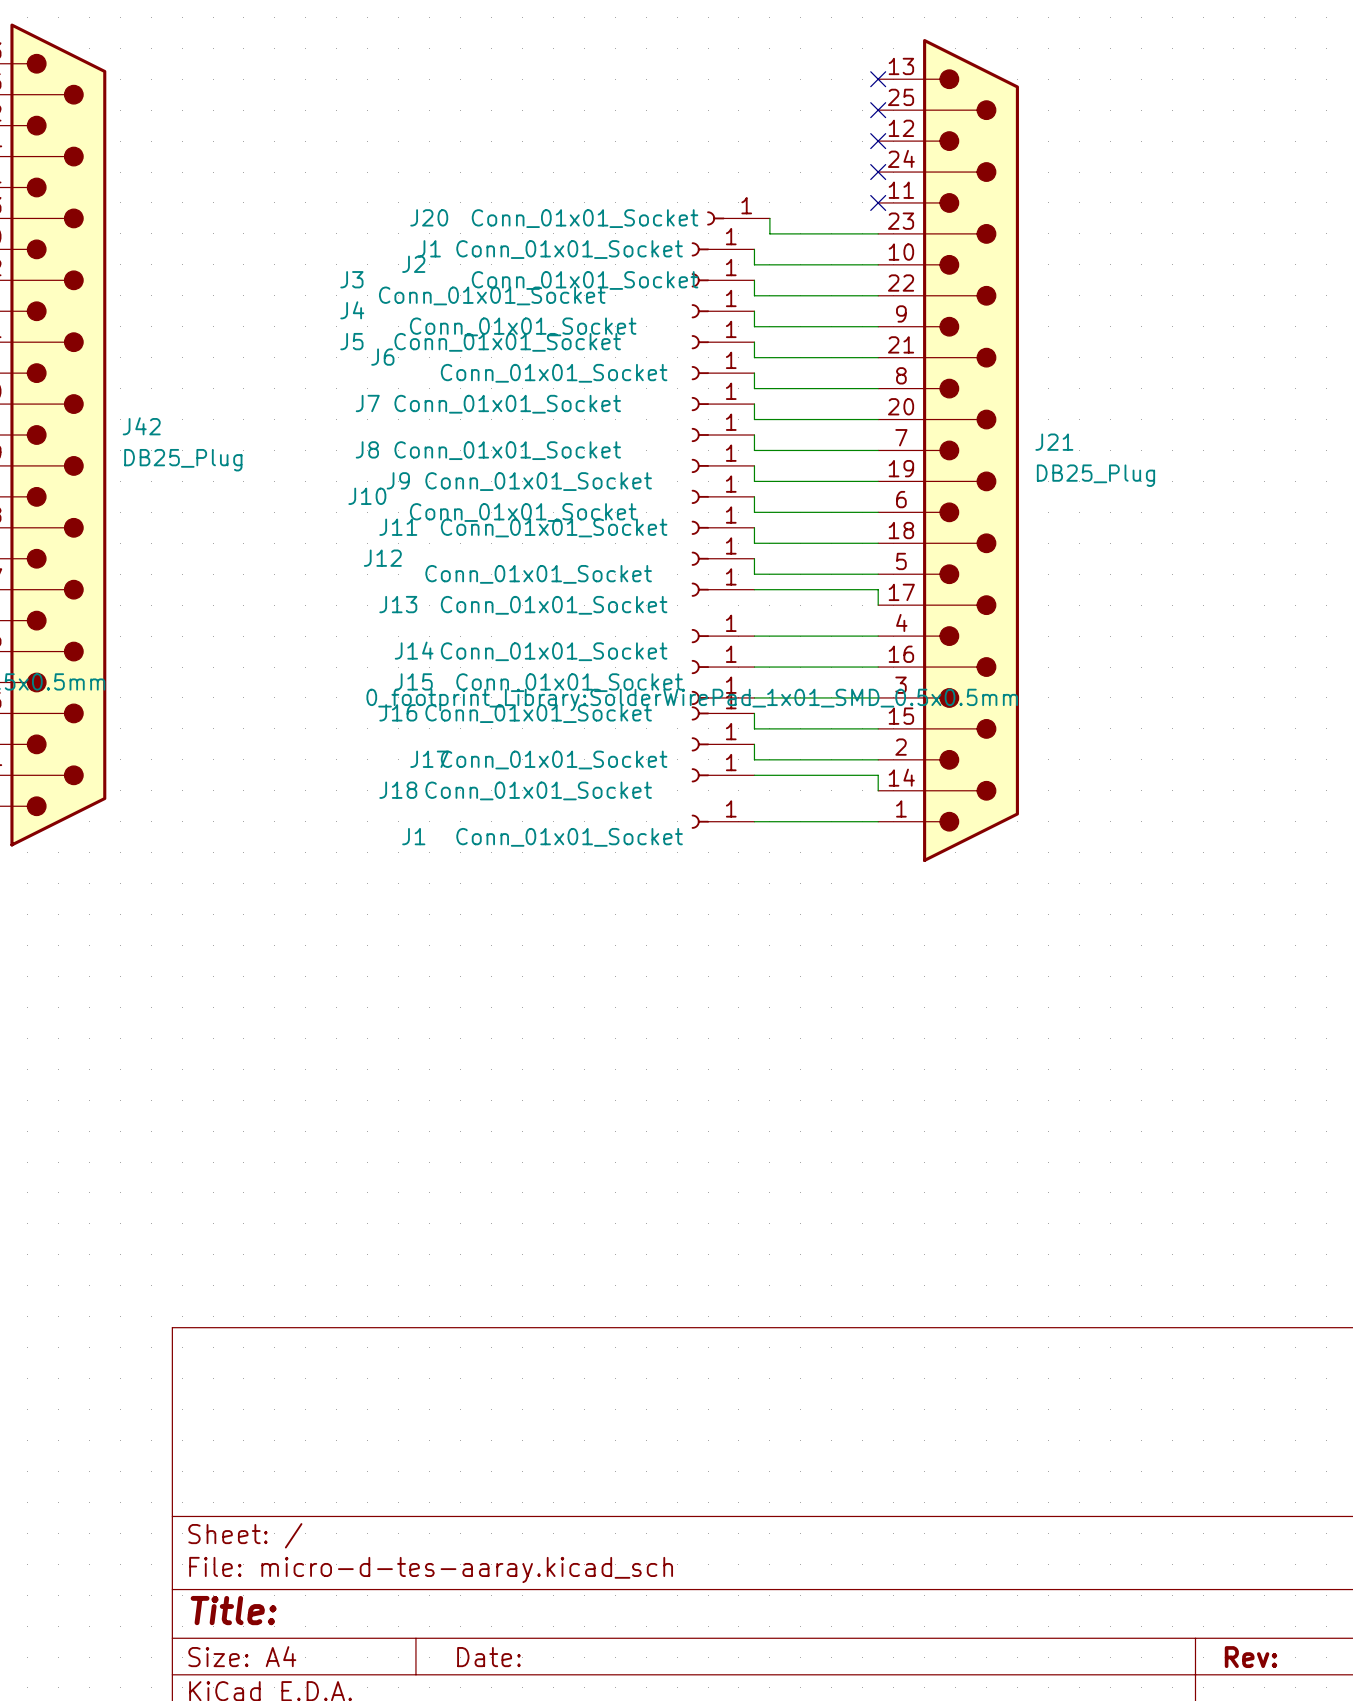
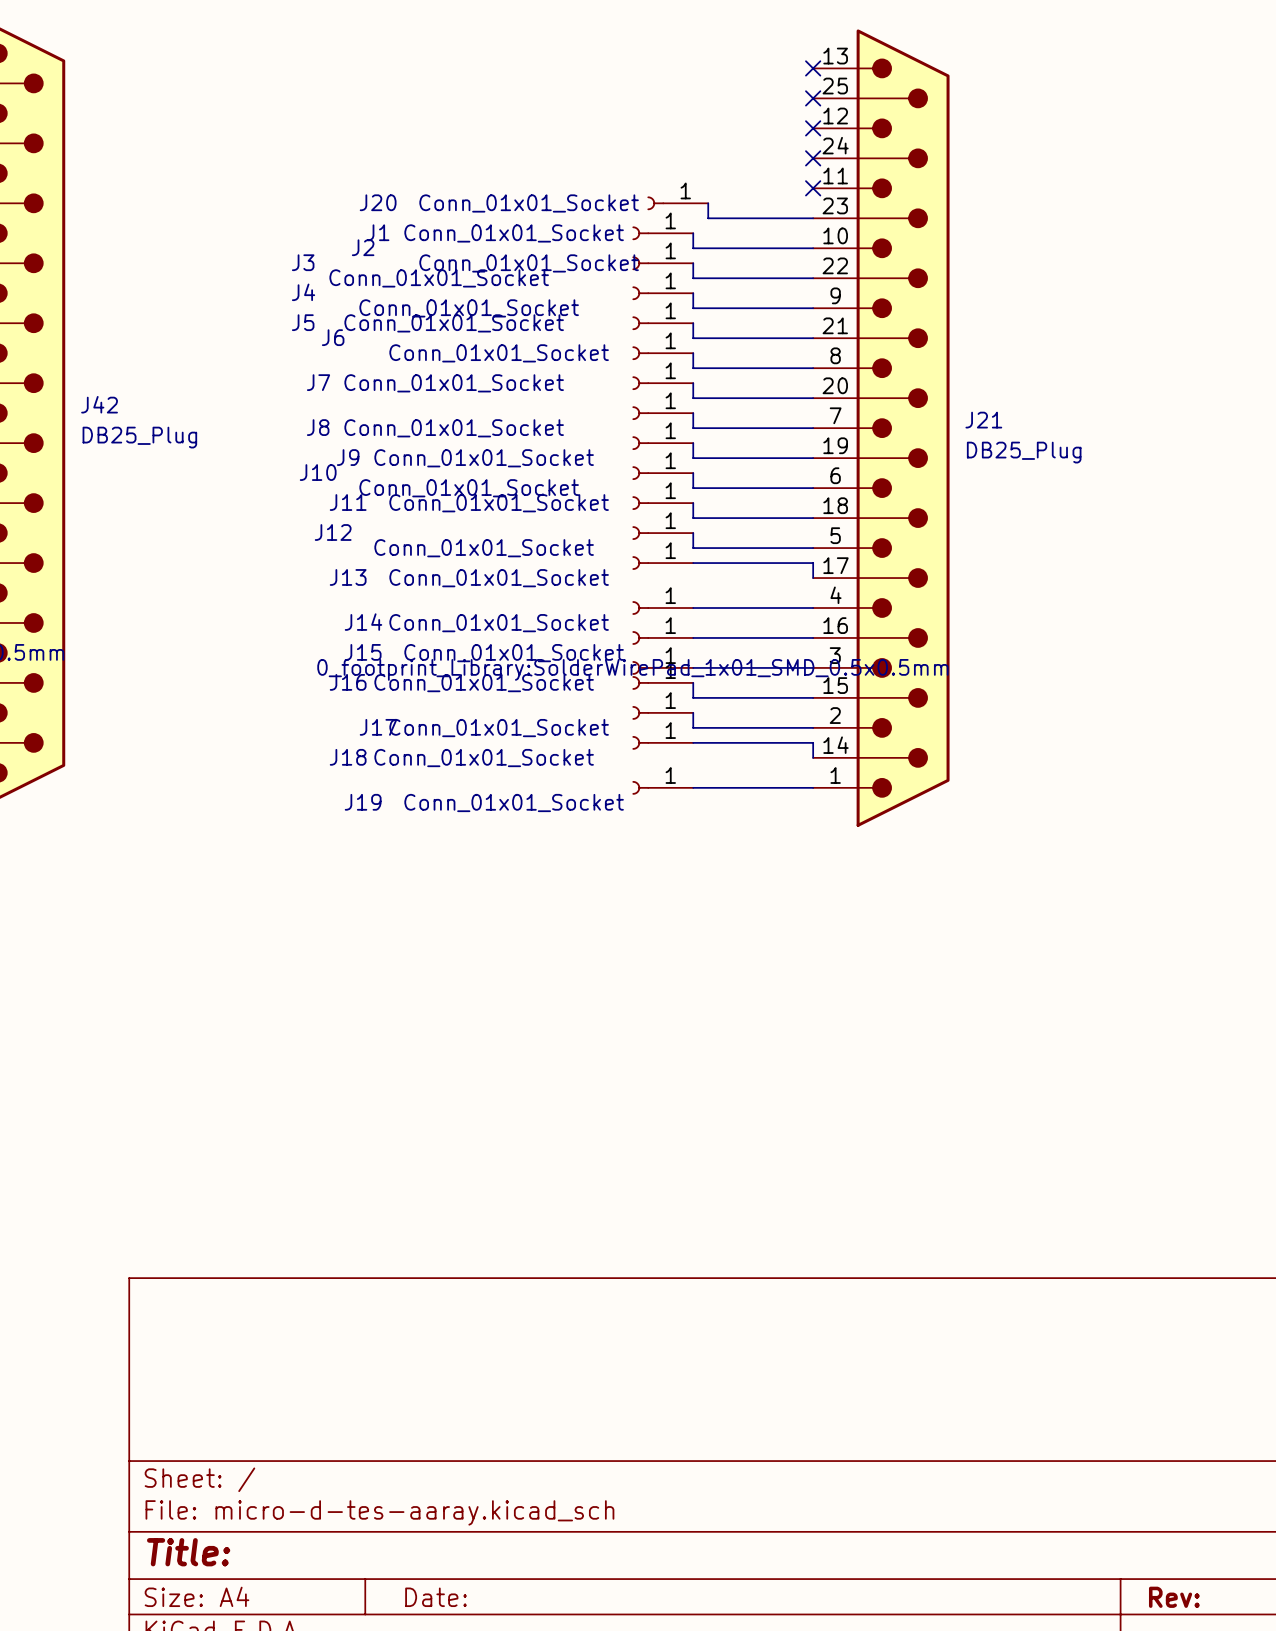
J1 name: J1 (413, 836) -> J19 (363, 802)

